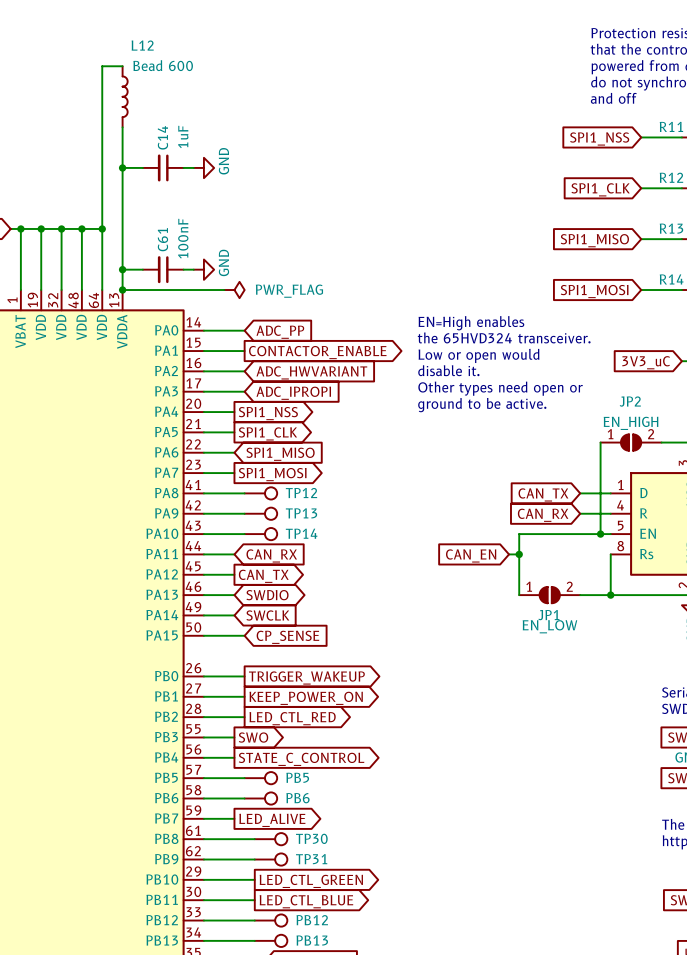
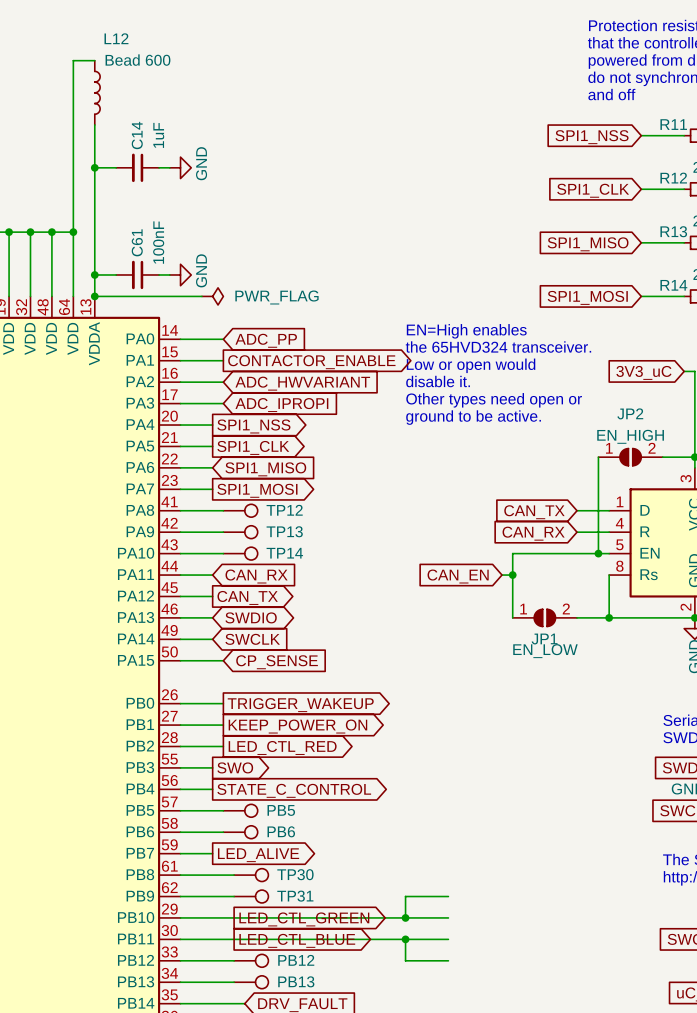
wire: none -> (448, 896) (405, 896) (405, 917)
wire: none -> (234, 917) (448, 917)
junction: none -> (405, 917)
wire: none -> (234, 939) (448, 939)
wire: none -> (405, 939) (405, 960) (448, 960)
junction: none -> (405, 939)

